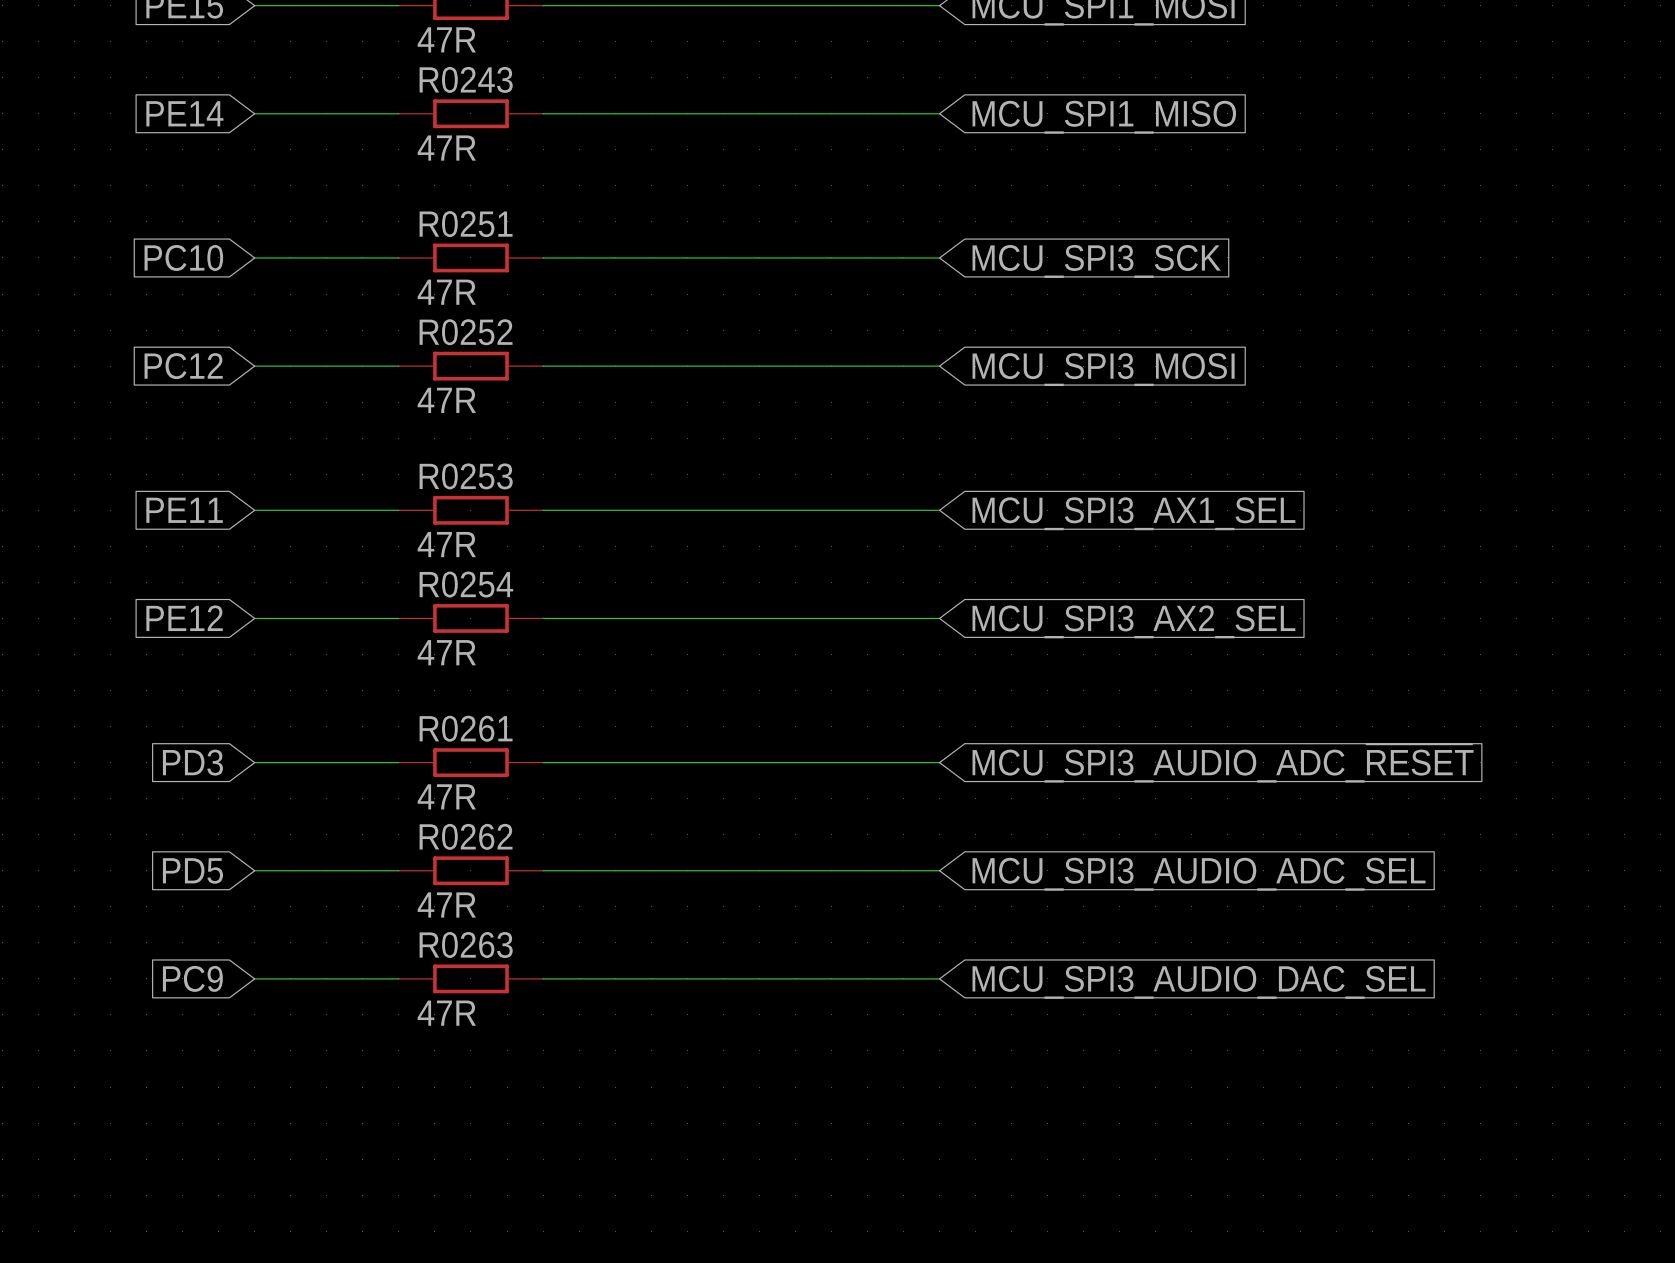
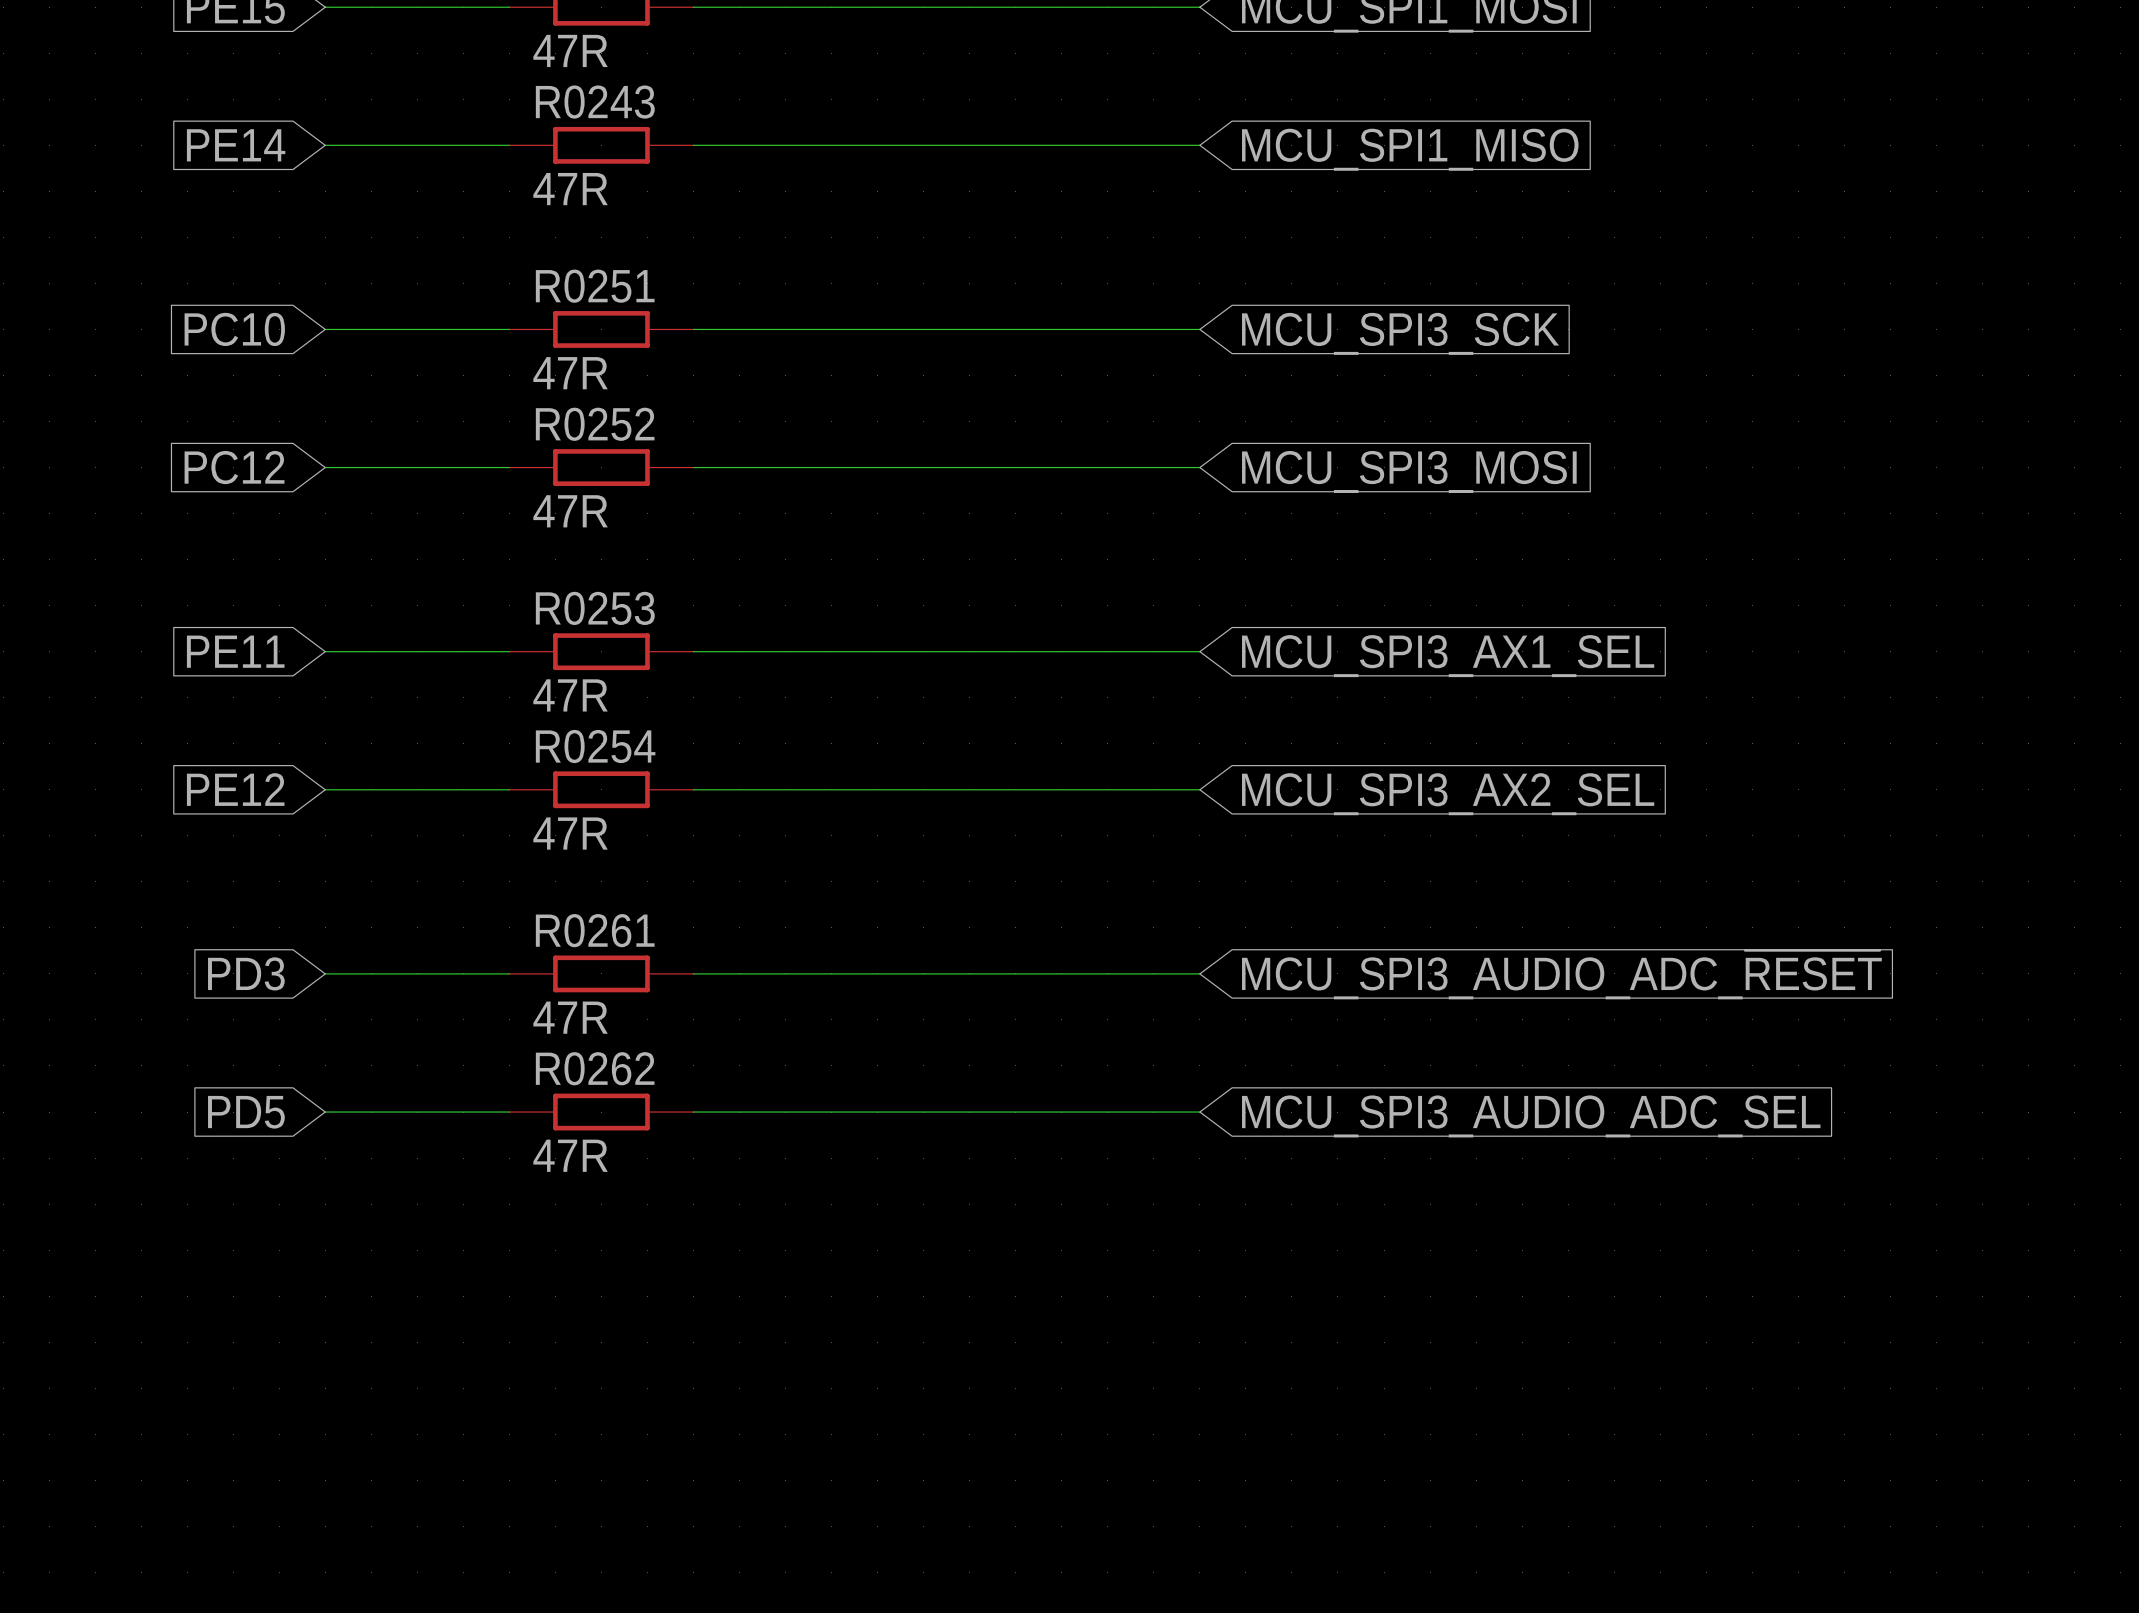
global label: PC9 (192, 978) -> none
wire: (254, 978) (398, 978) -> none
R0263: 47R (470, 978) -> none
wire: (543, 978) (939, 978) -> none
global label: MCU_SPI3_AUDIO_DAC_SEL (1199, 982) -> none

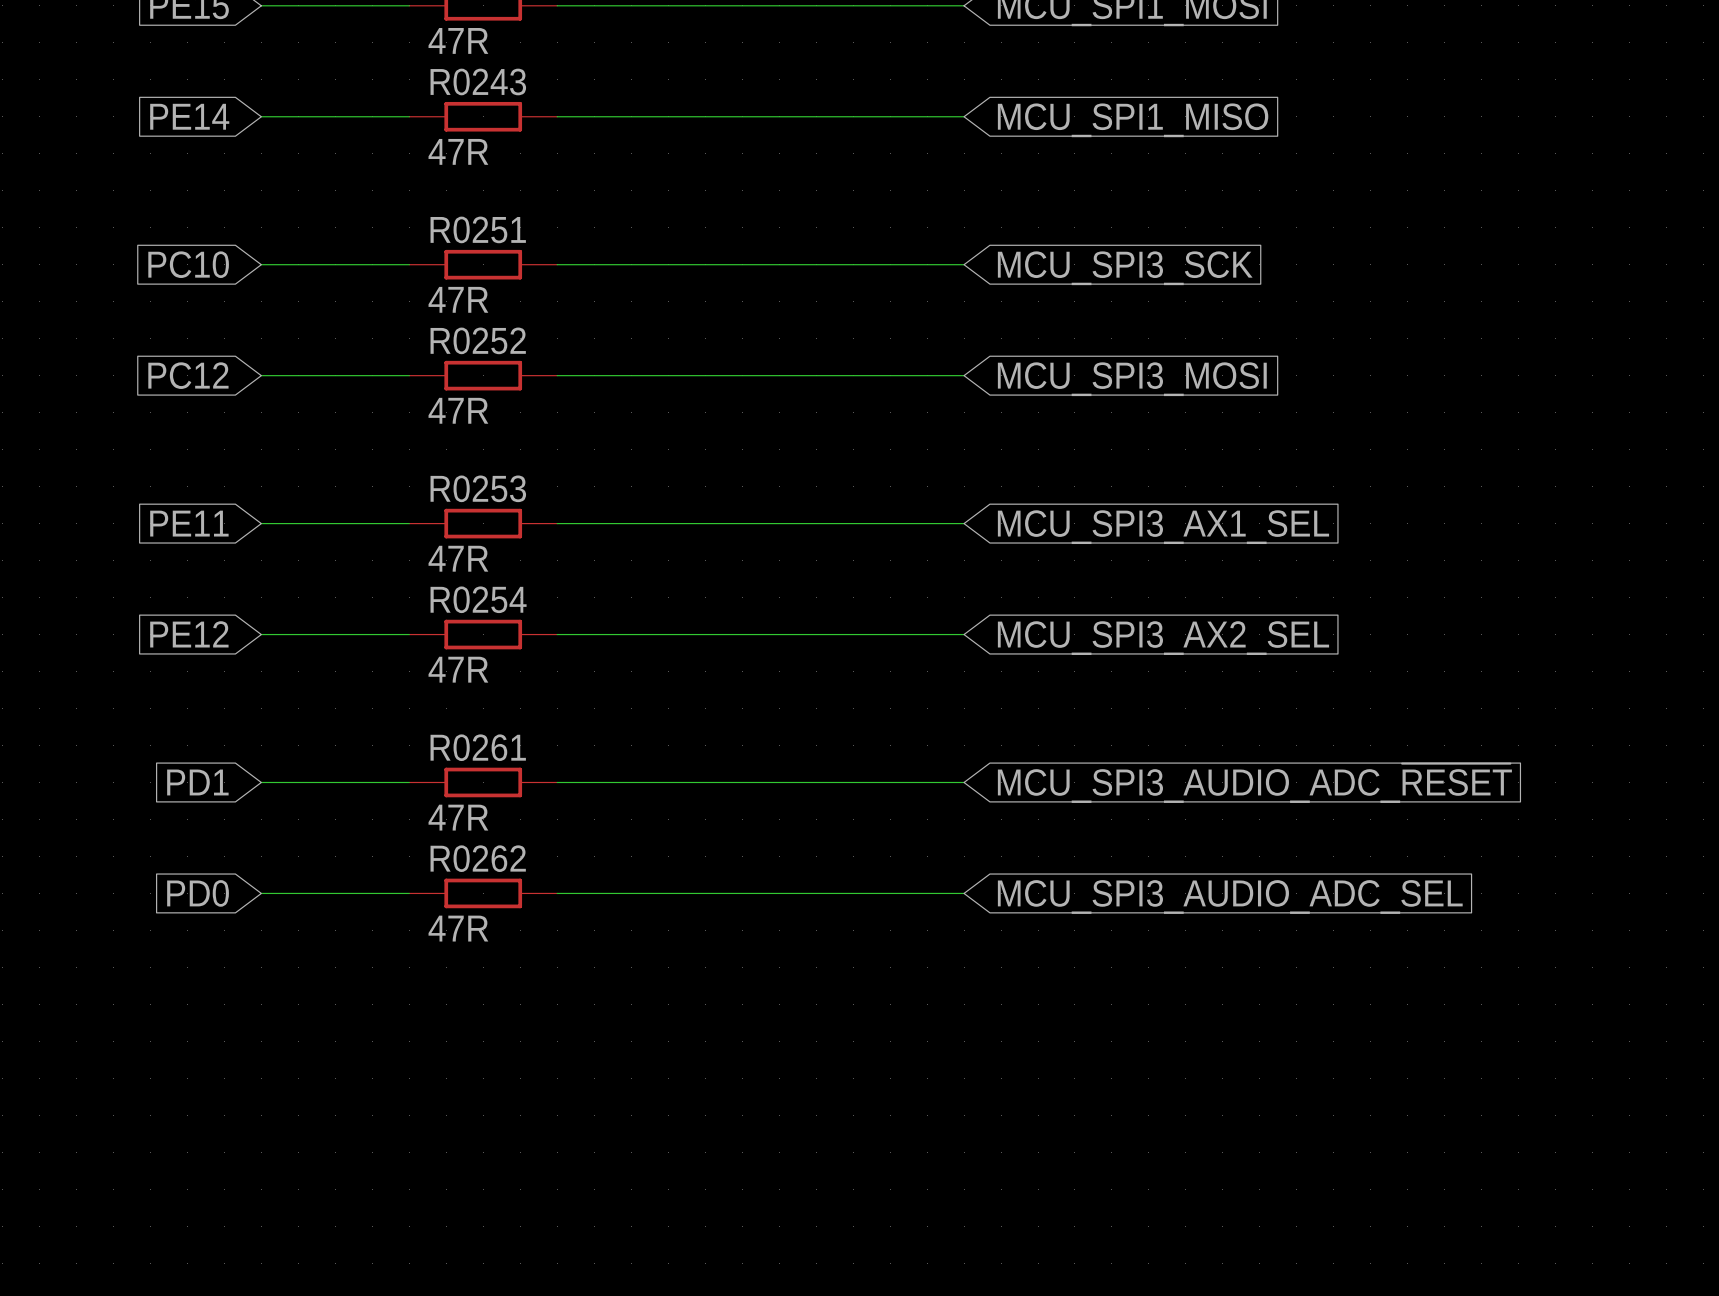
global label: PD3 (246, 973) -> PD1 (197, 782)
global label: PD5 (246, 1112) -> PD0 (198, 893)

